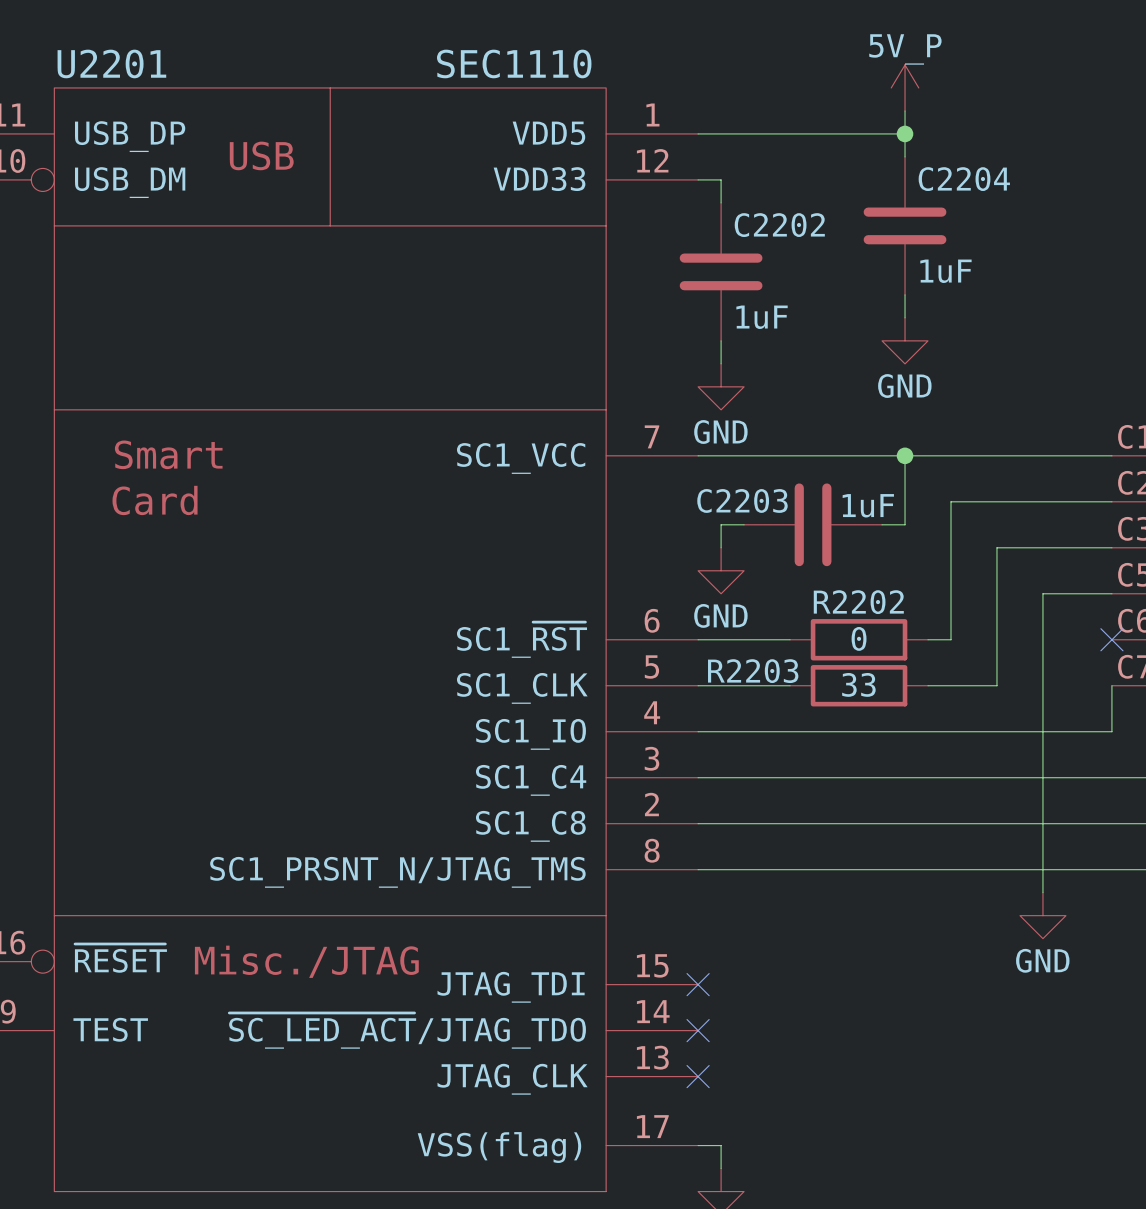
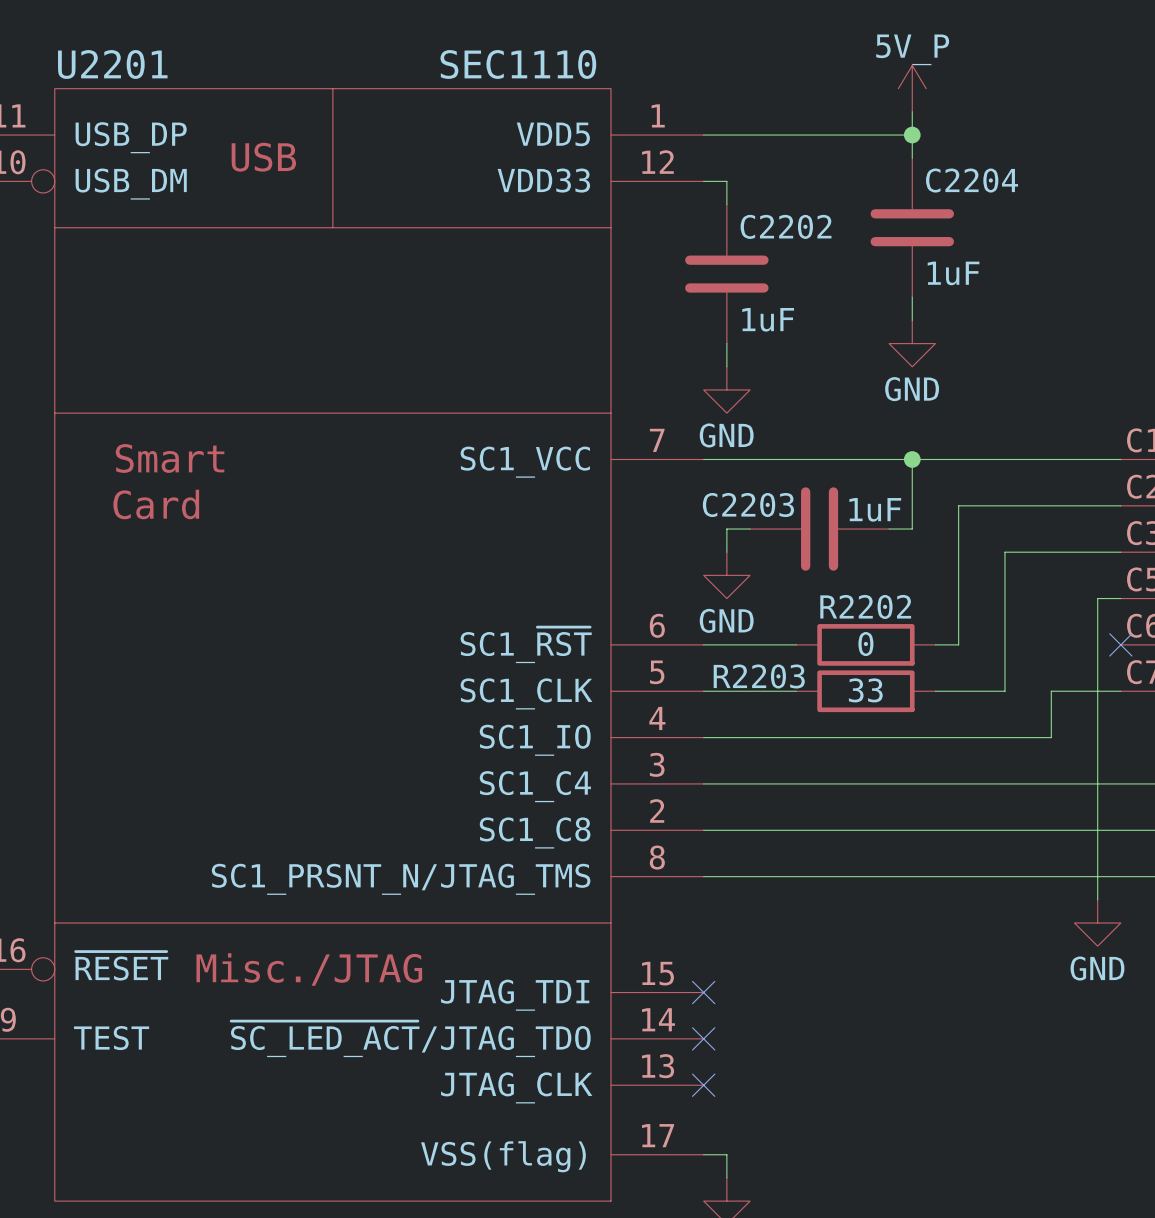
wire: (1088, 593) (1042, 593) (1042, 685) -> (1120, 691) (1051, 691)
wire: none -> (1097, 598) (1097, 899)
wire: (1111, 685) (1111, 731) (1042, 731) (1042, 892) -> none
power symbol position: GND (1042, 915) -> GND (1097, 923)

